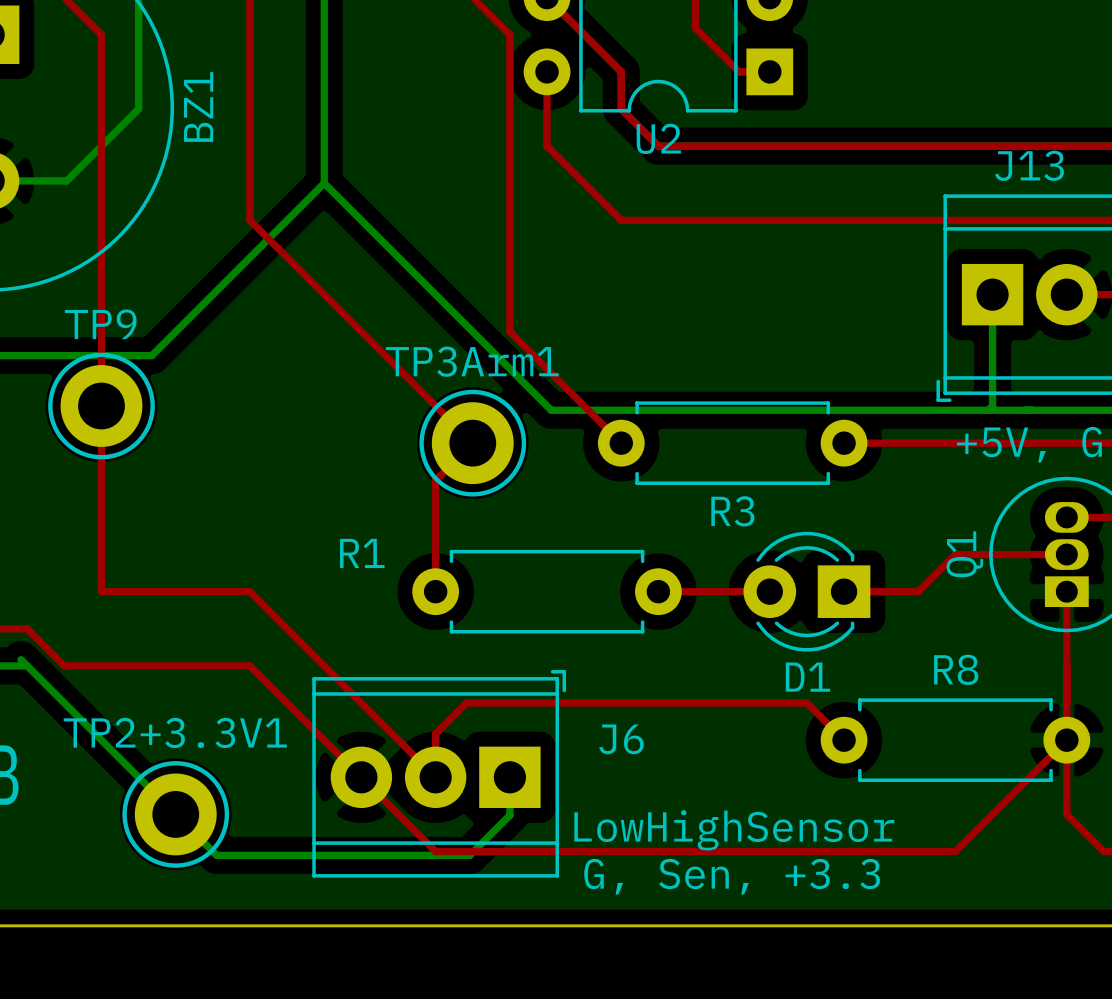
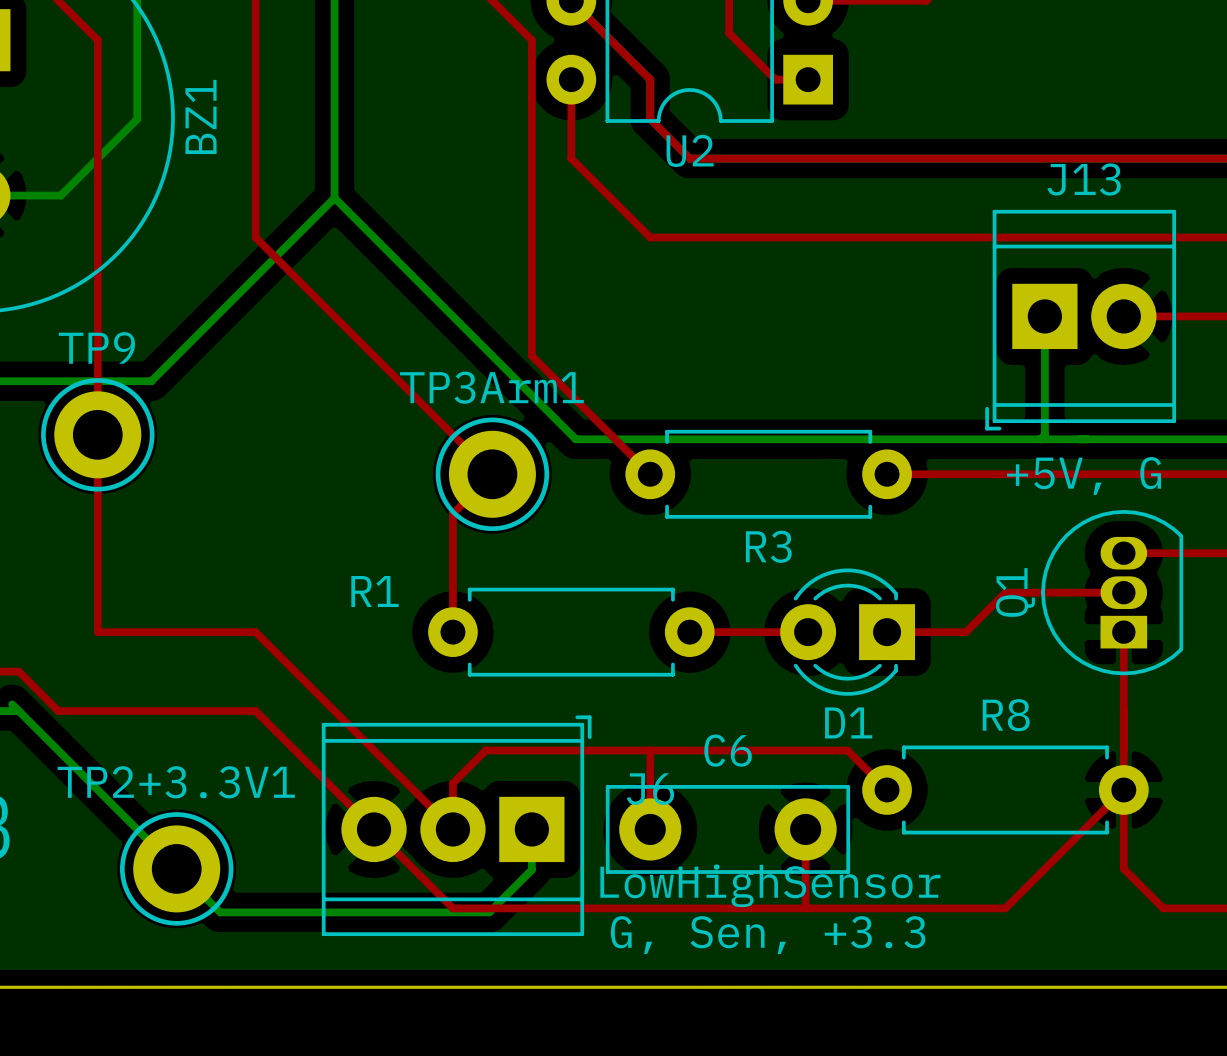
top track: none -> (650, 750) (650, 829)
C6: none -> (727, 829)
top track: none -> (805, 829) (805, 905)

